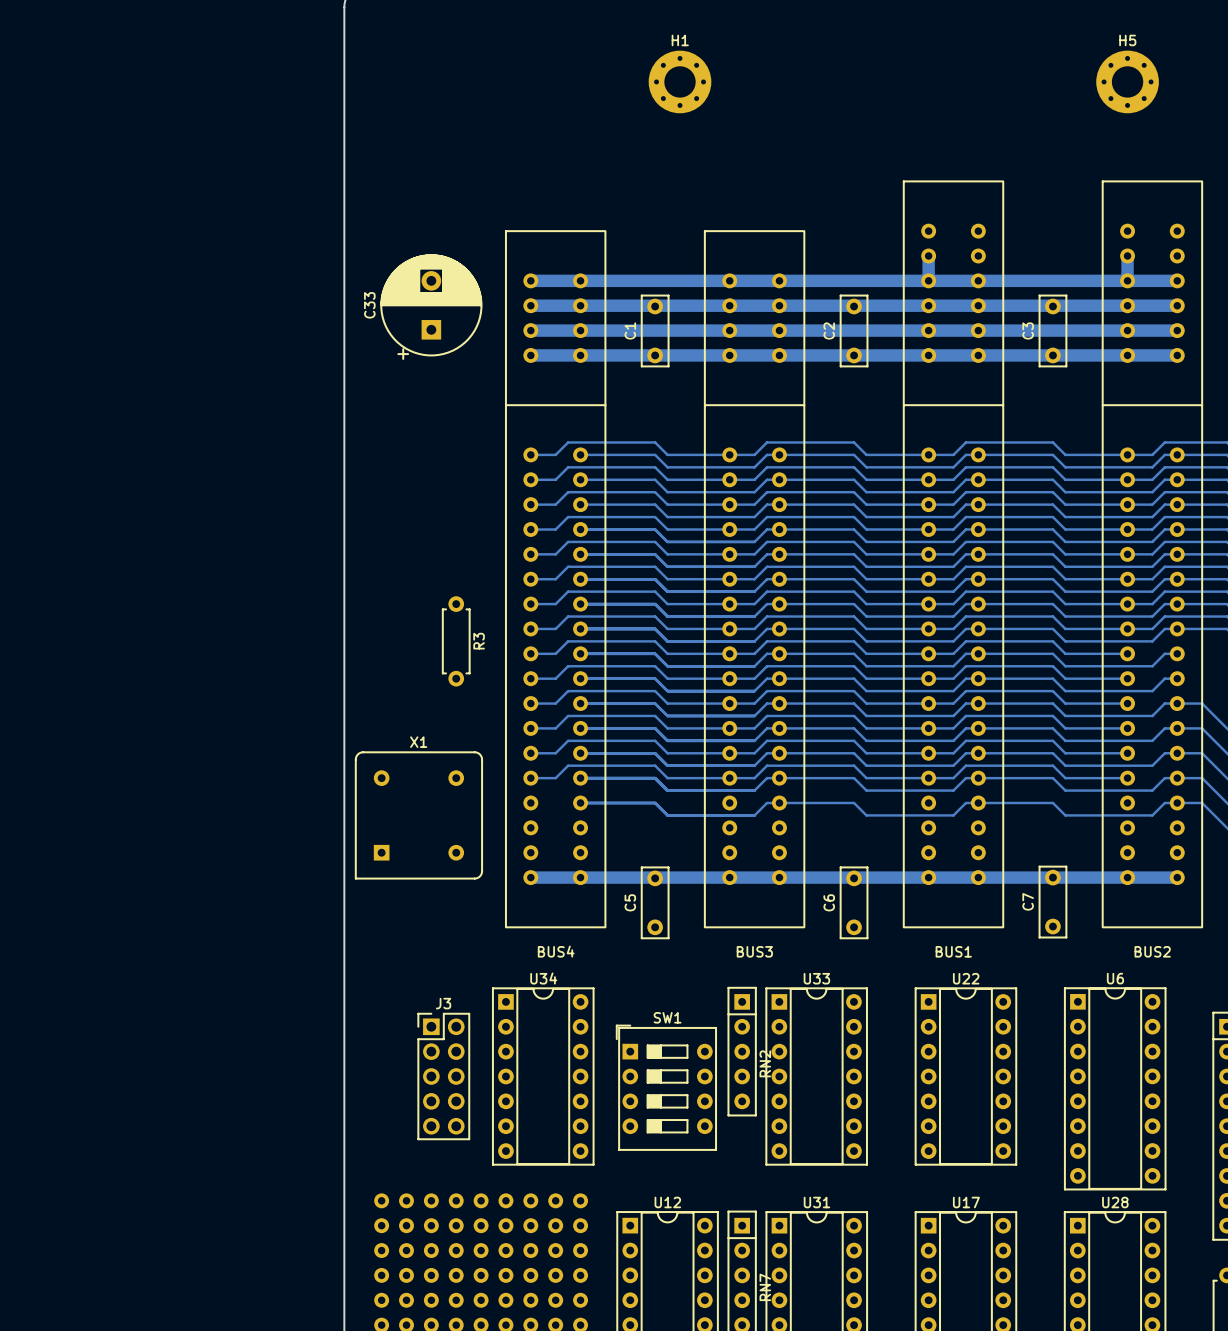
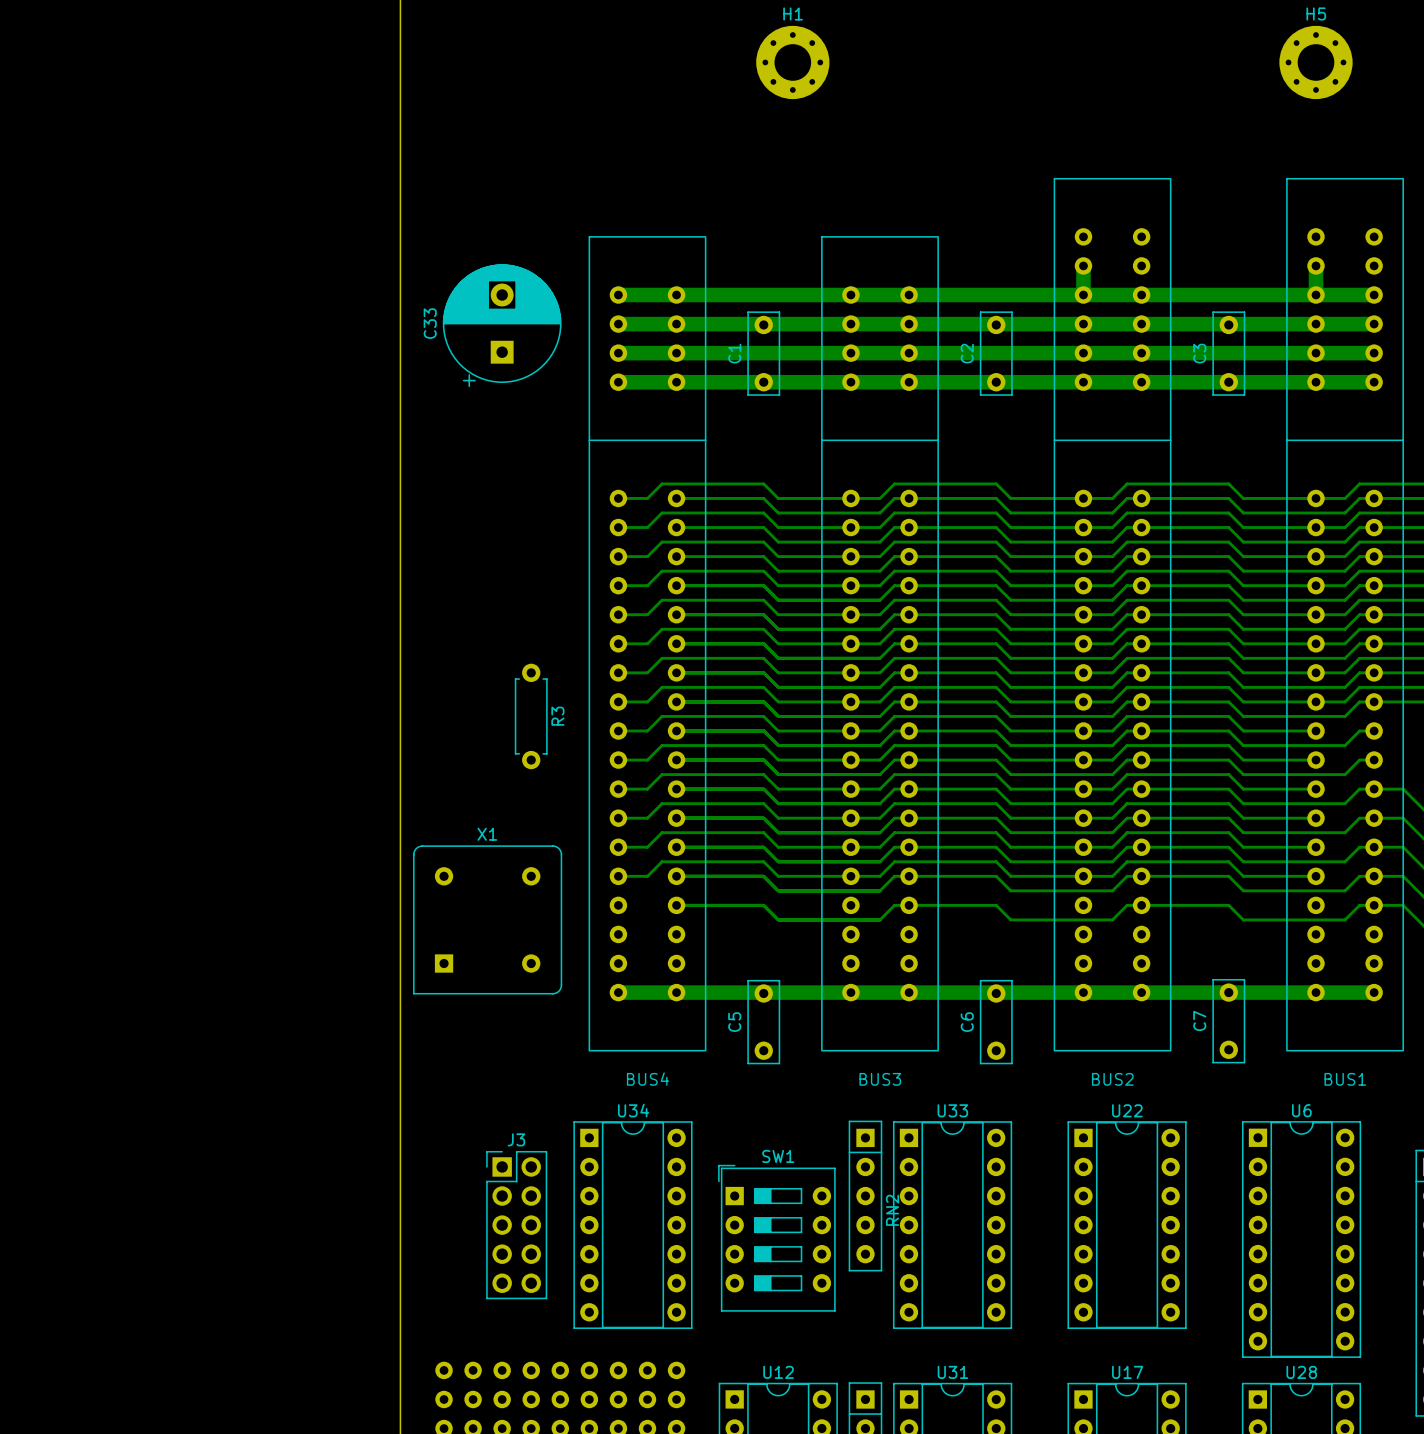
BUS1 name: BUS1 (953, 951) -> BUS2 (1112, 1079)
BUS2 name: BUS2 (1152, 951) -> BUS1 (1345, 1079)

